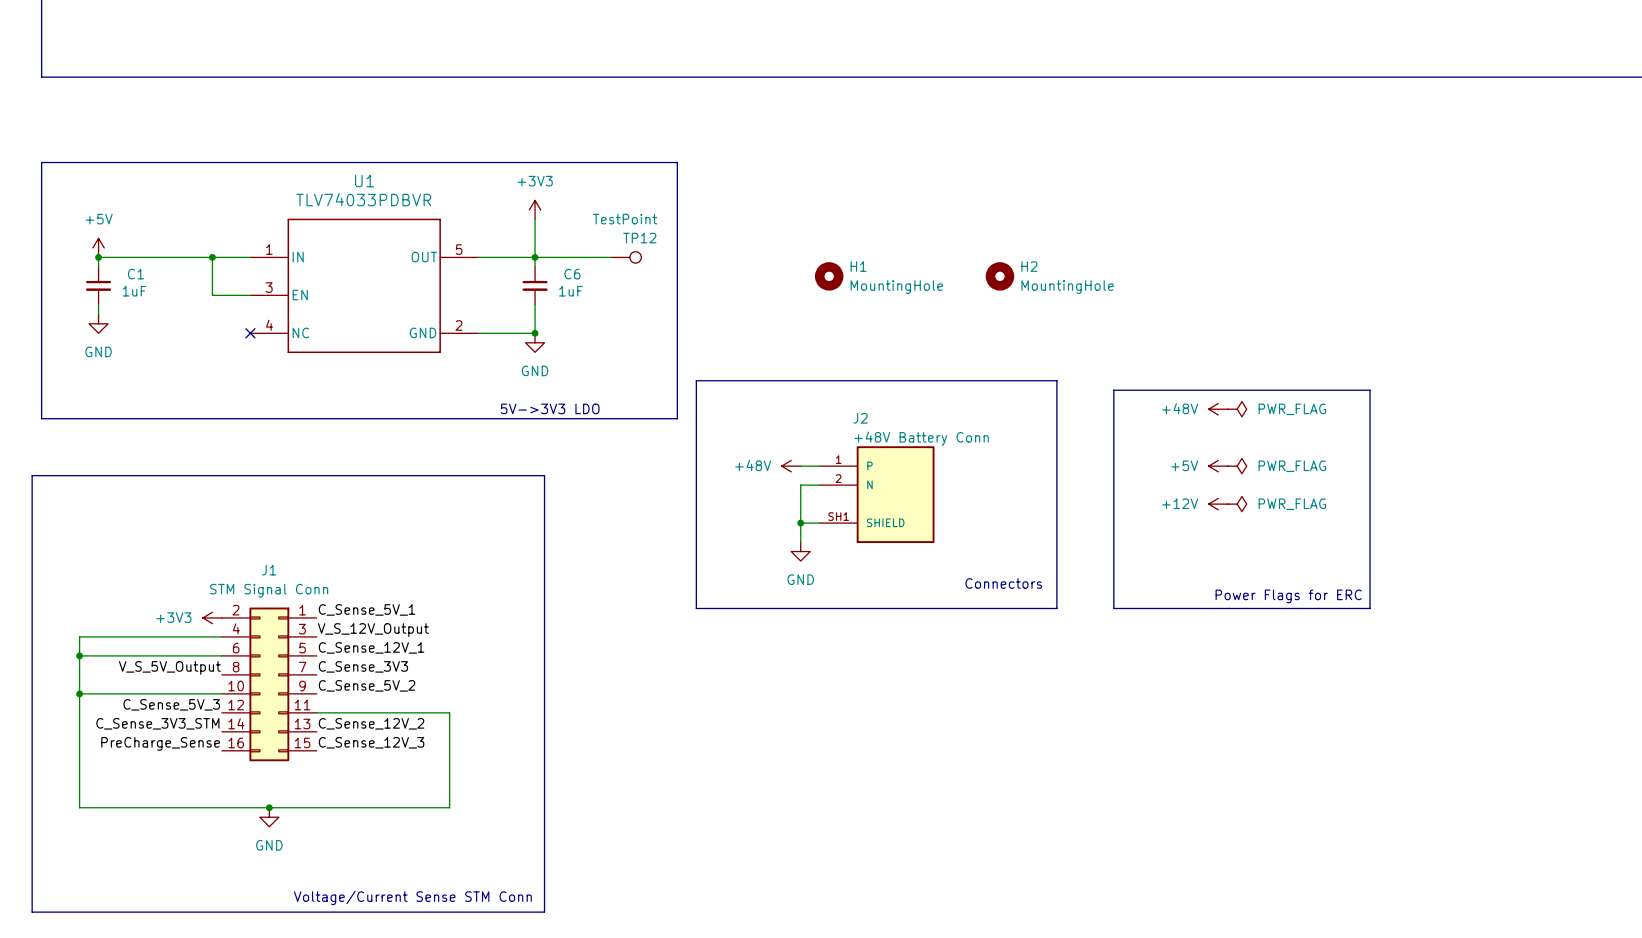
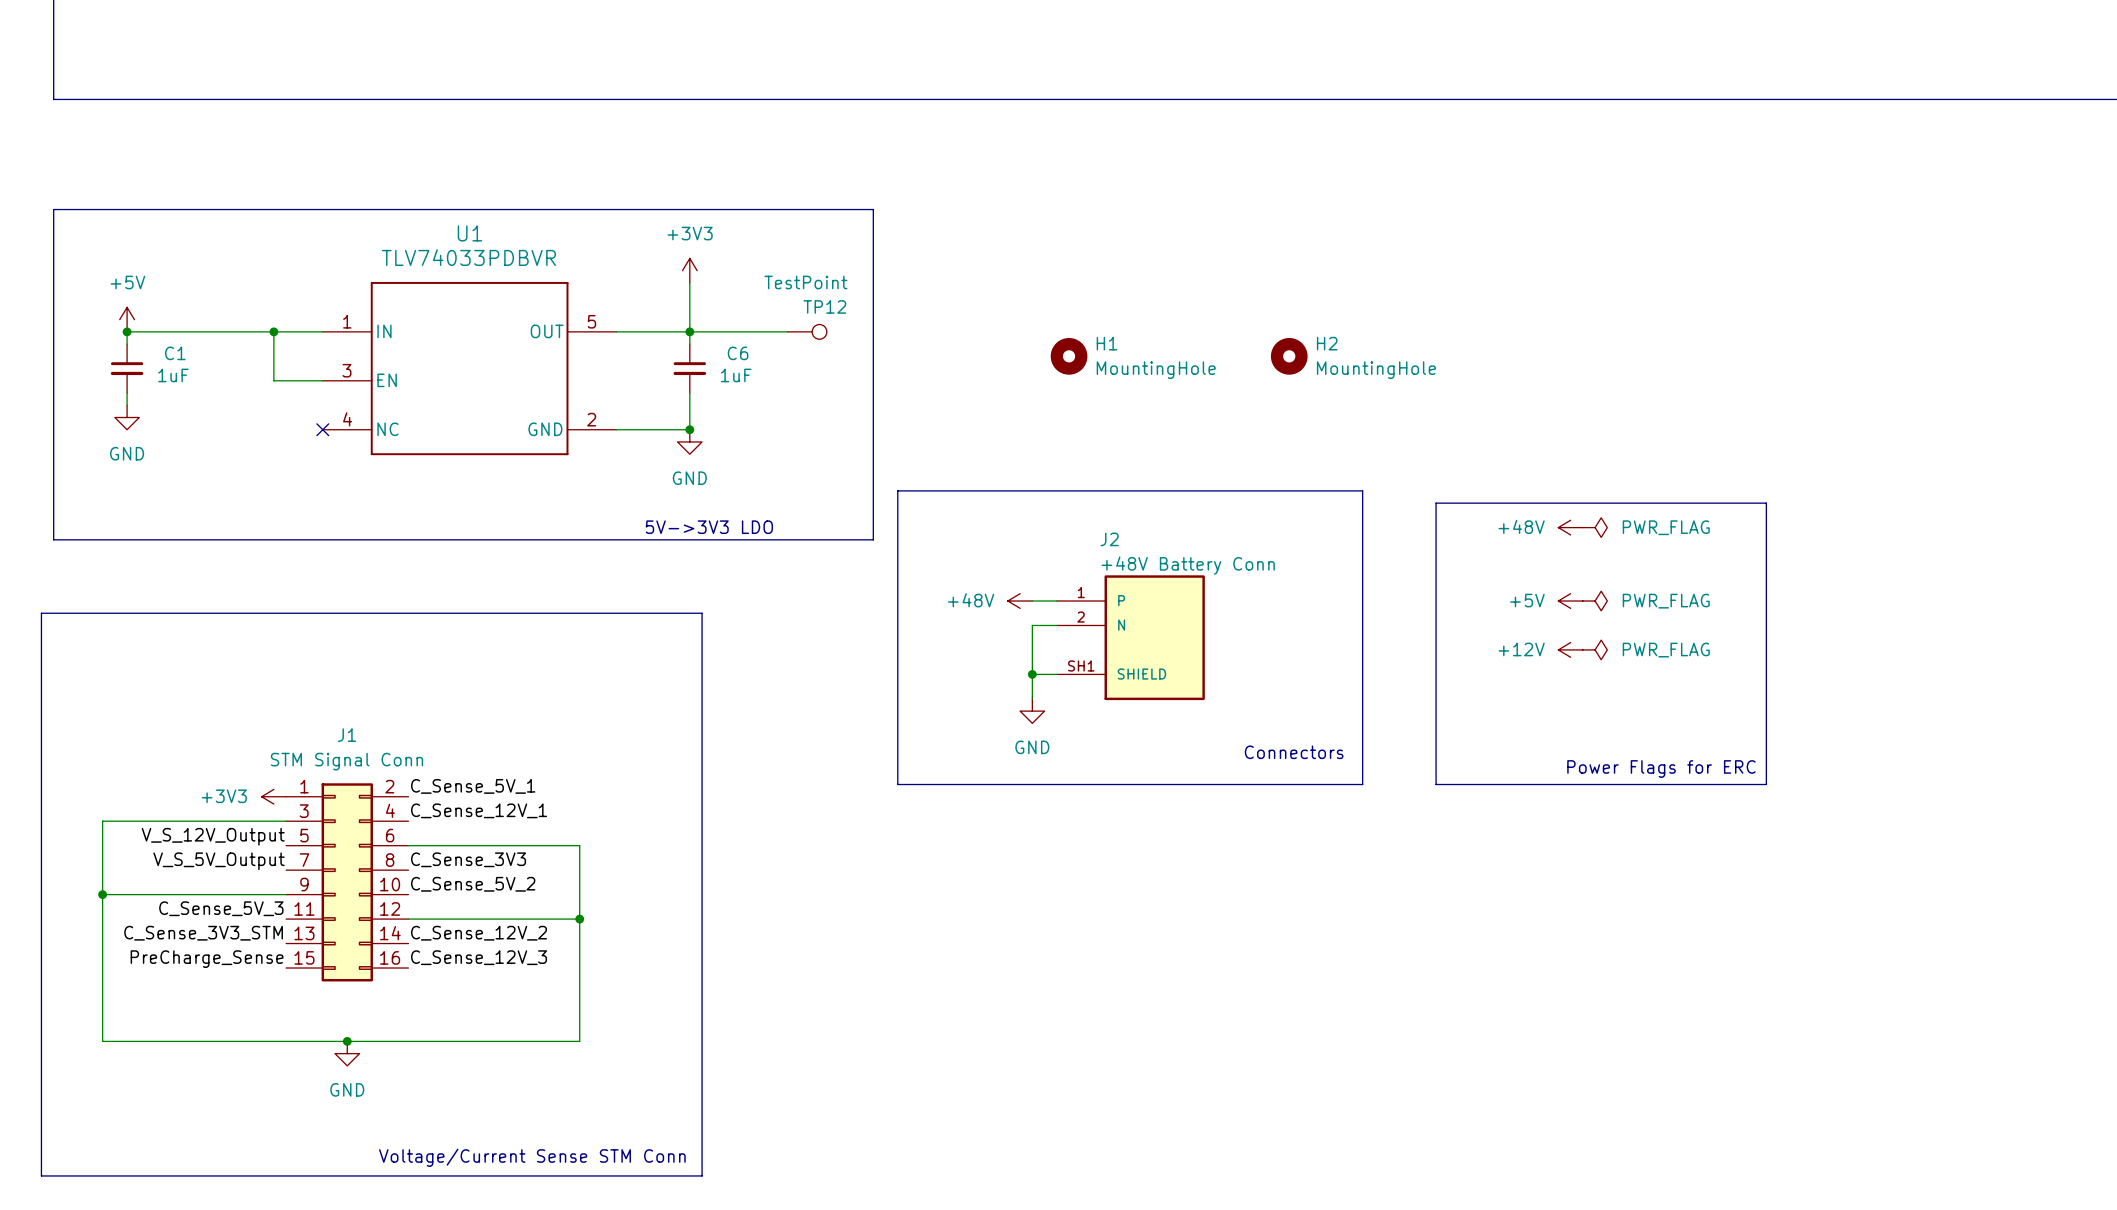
label: V_S_12V_Output (373, 630) -> C_Sense_12V_1 (479, 810)
label: C_Sense_12V_1 (371, 647) -> none
label: none -> V_S_12V_Output (213, 836)
wire: (79, 655) (221, 655) -> none
junction: (79, 655) -> none
wire: none -> (408, 845) (579, 845) (579, 919)
J1 flip: as is (269, 684) -> left-right (347, 882)
junction: none -> (579, 919)

